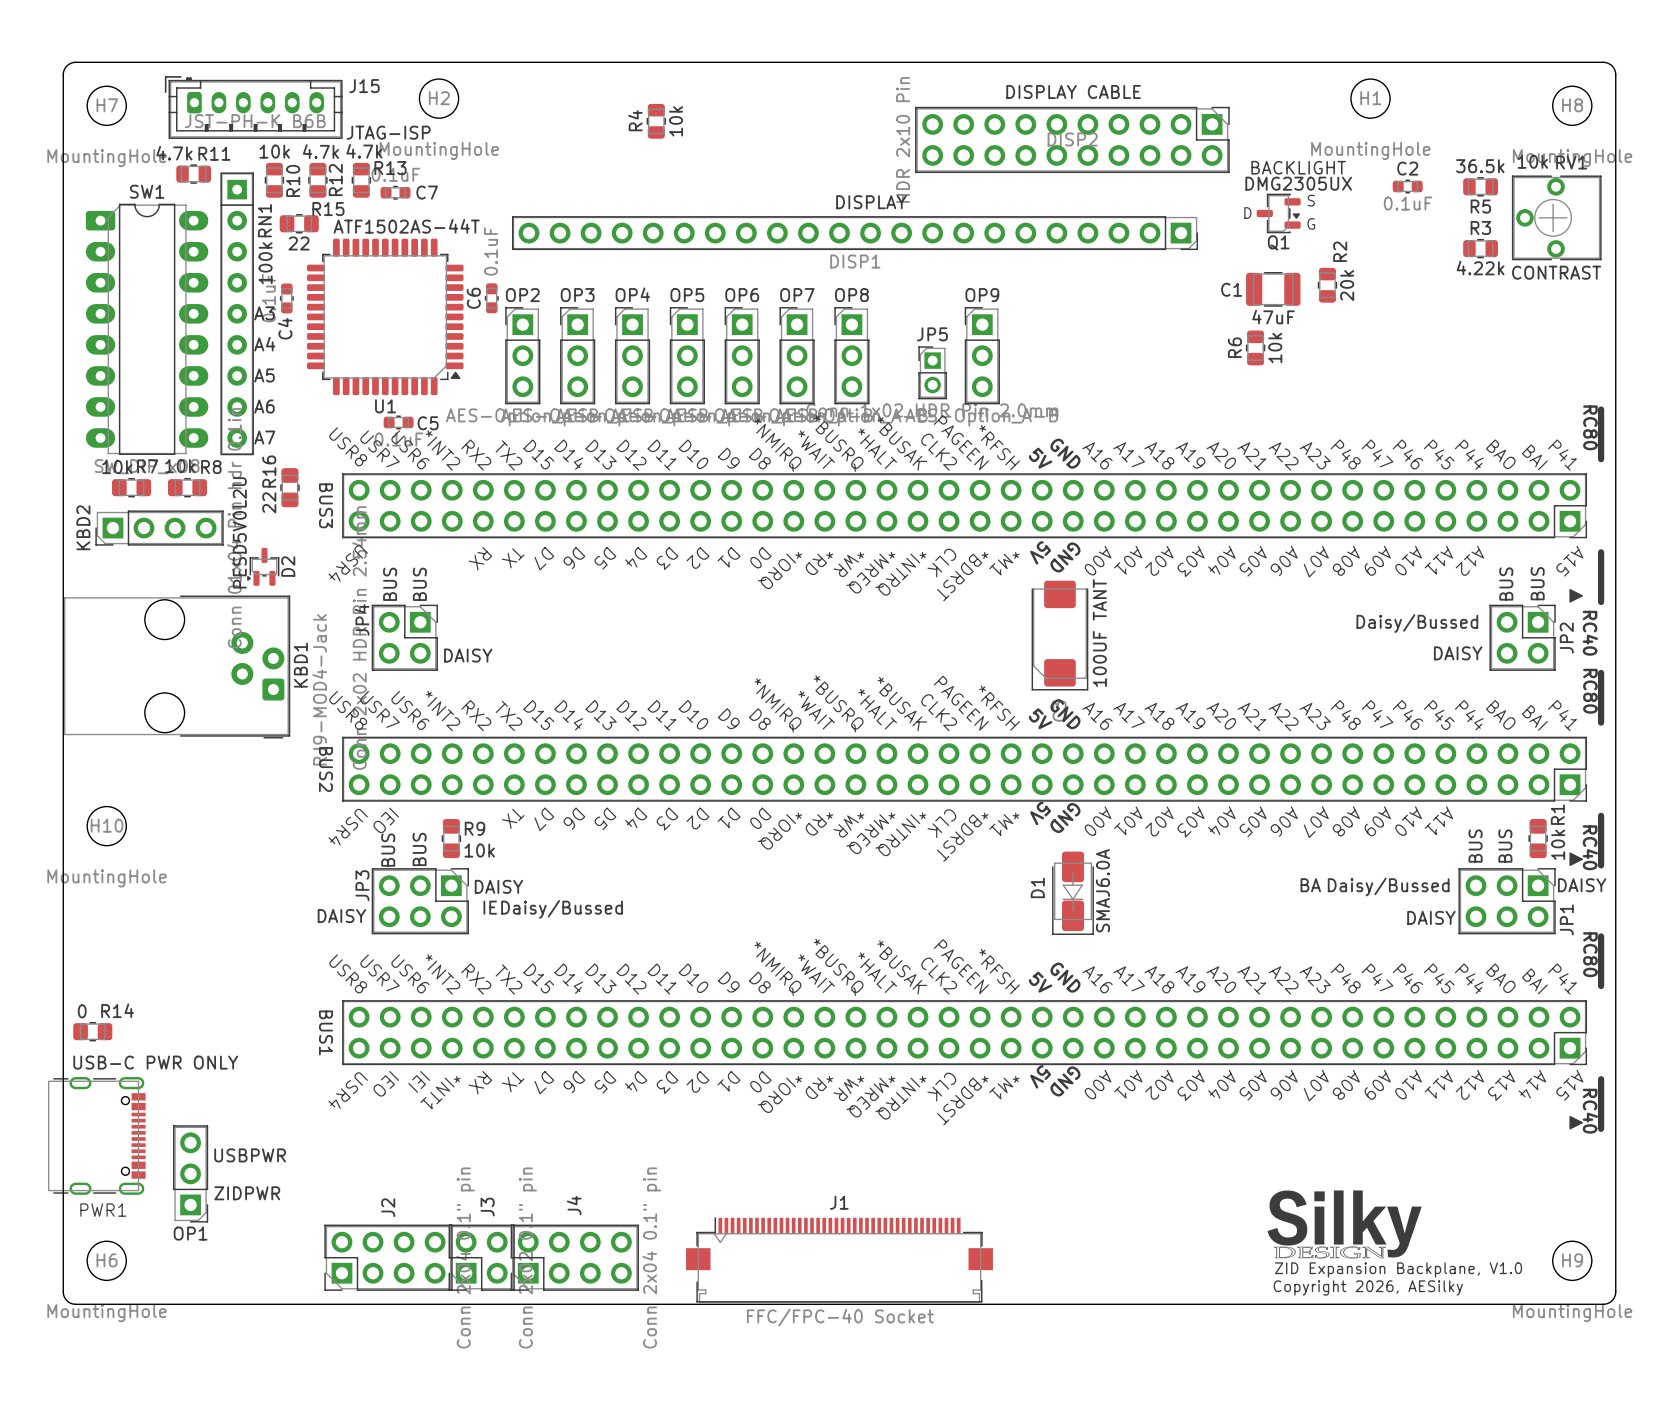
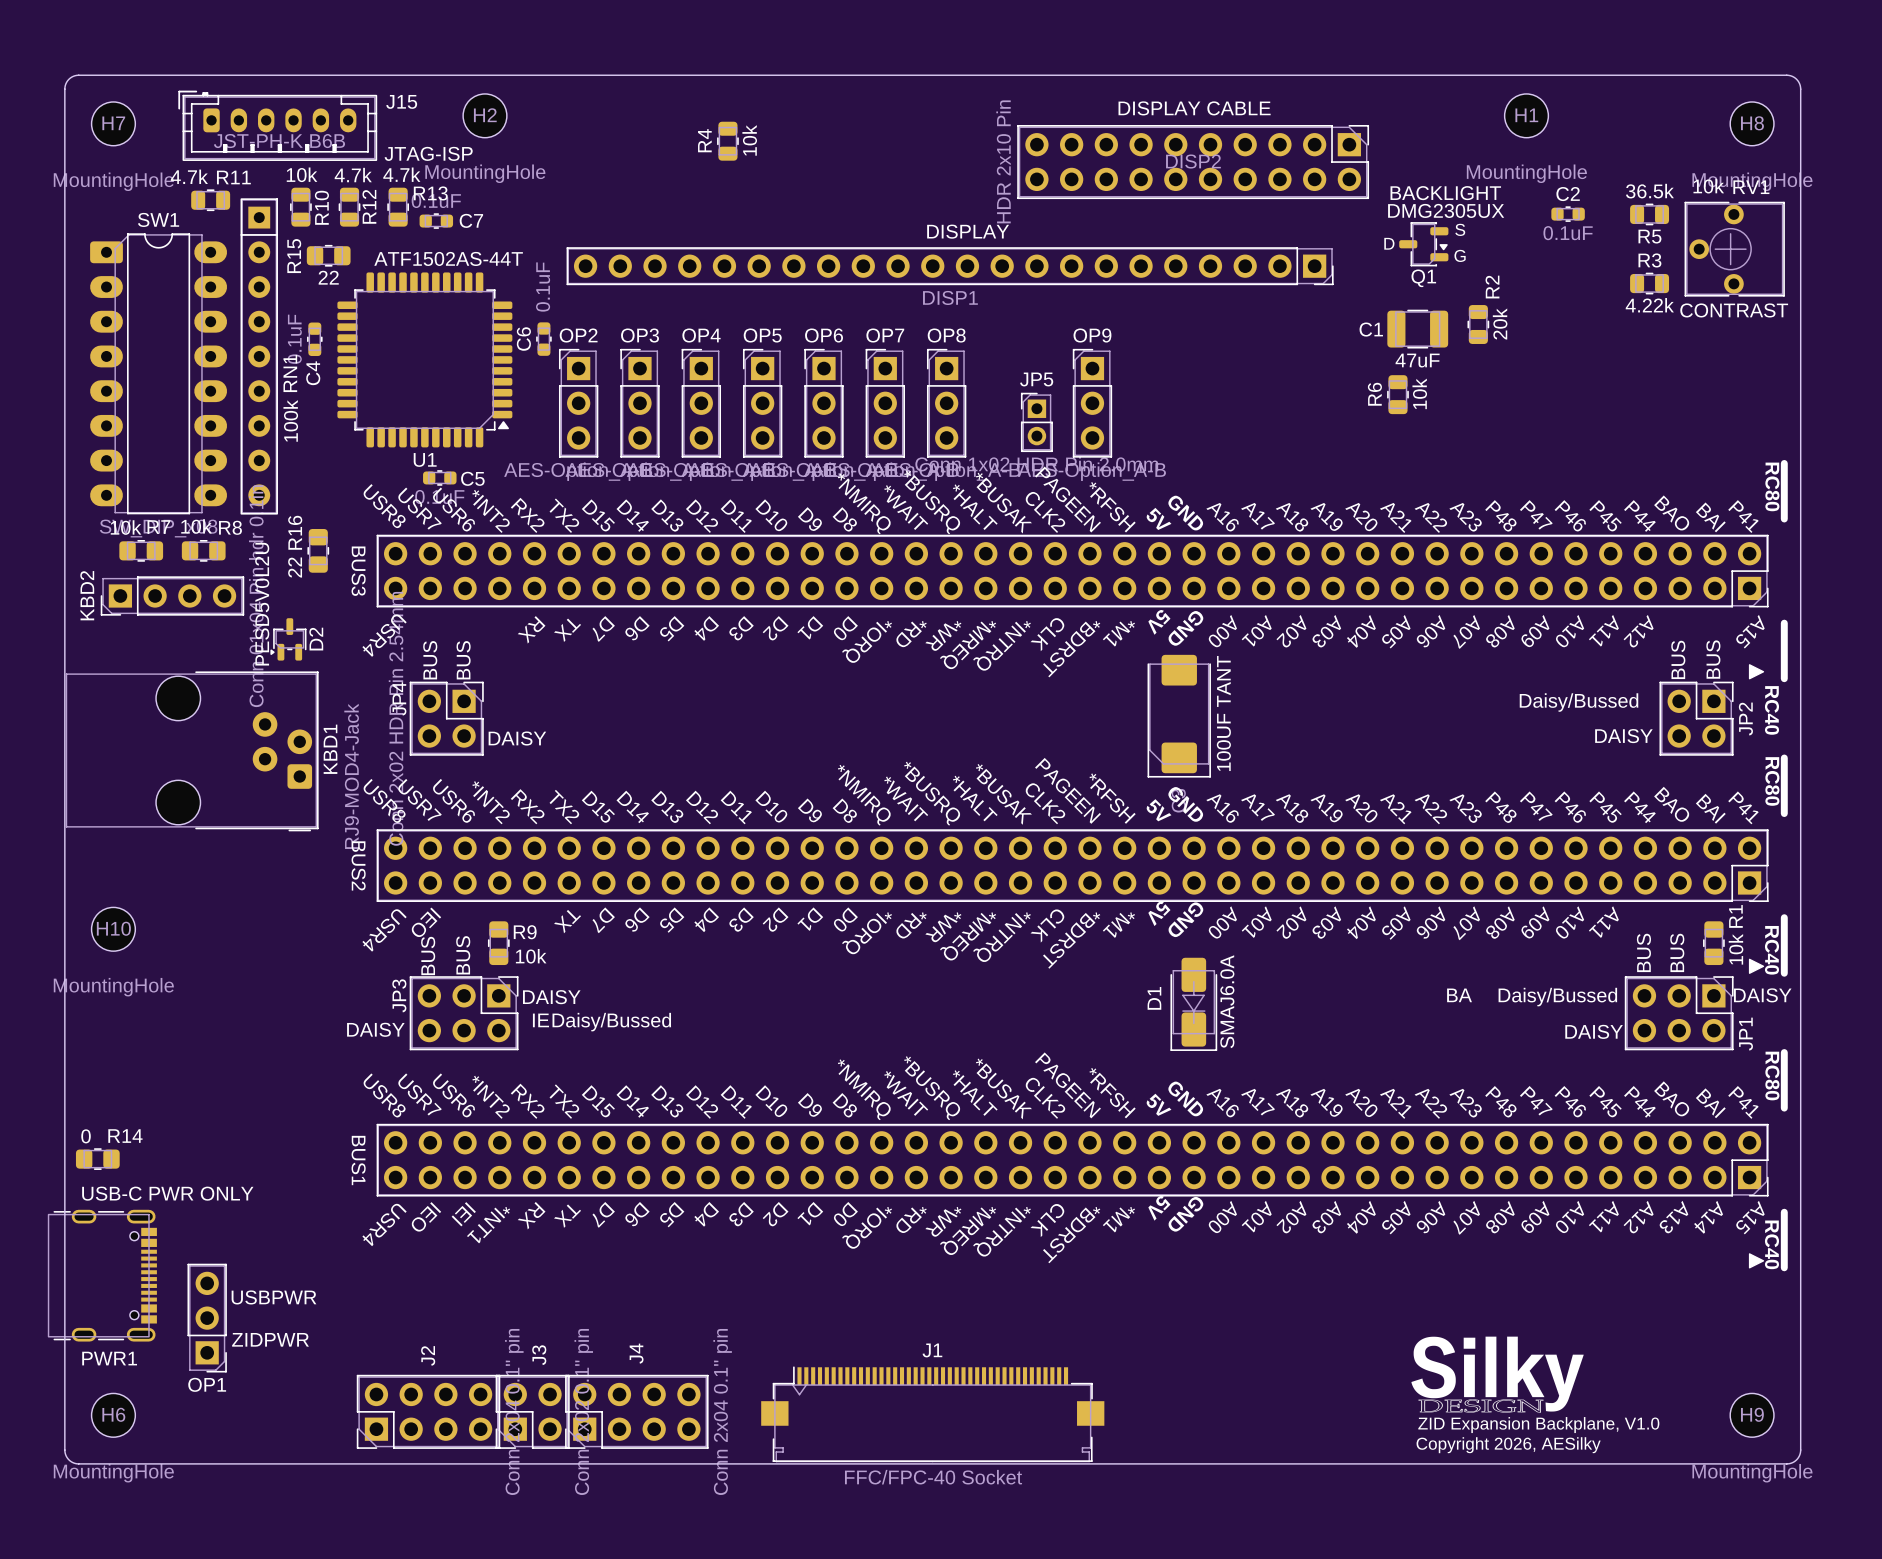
R15 name rotation: 0° (328, 209) -> 90° counterclockwise (294, 256)
R15 name position: R15 (328, 209) -> R15 (294, 256)
RN1 name position: RN1 (264, 220) -> RN1 (290, 373)
RN1 value position: 100k (265, 263) -> 100k (290, 420)
SW1 text: A3 (264, 313) -> none
SW1 text: A4 (264, 344) -> none
SW1 text: A5 (264, 375) -> none
SW1 text: A6 (264, 406) -> none
SW1 text: A7 (264, 437) -> none

